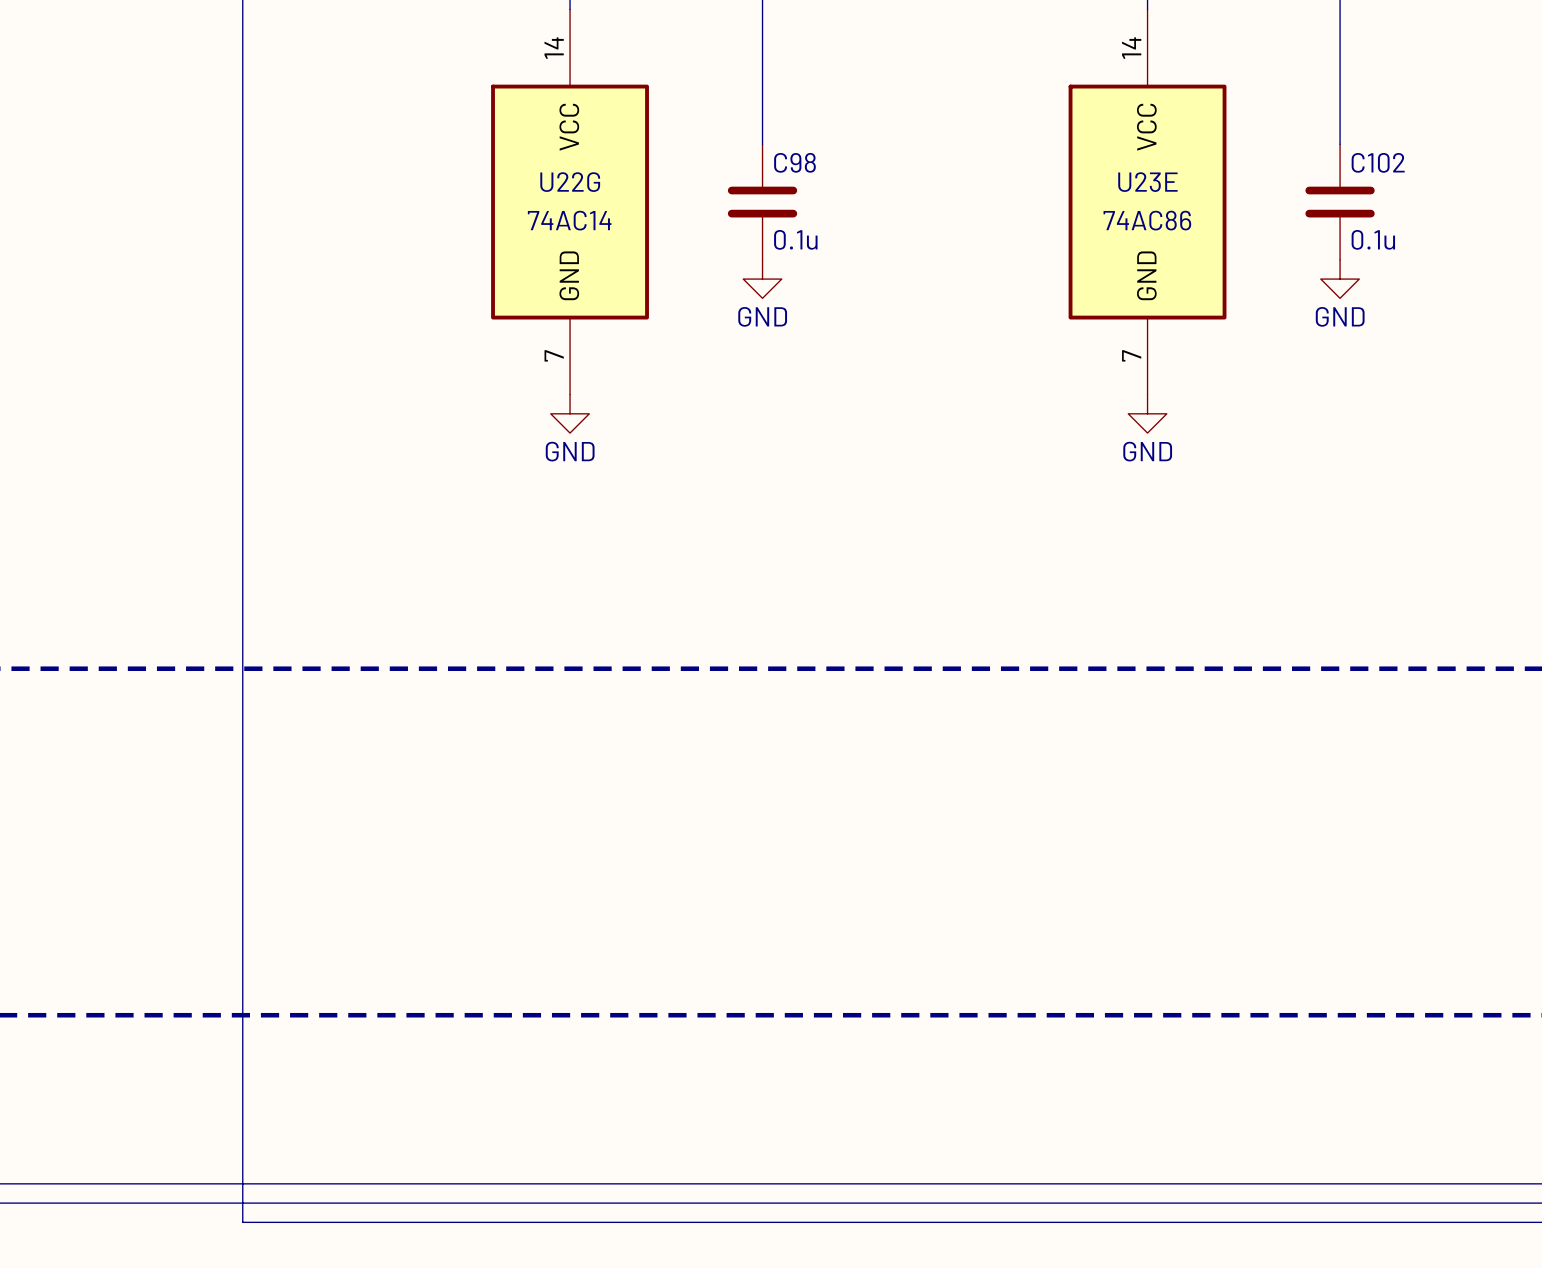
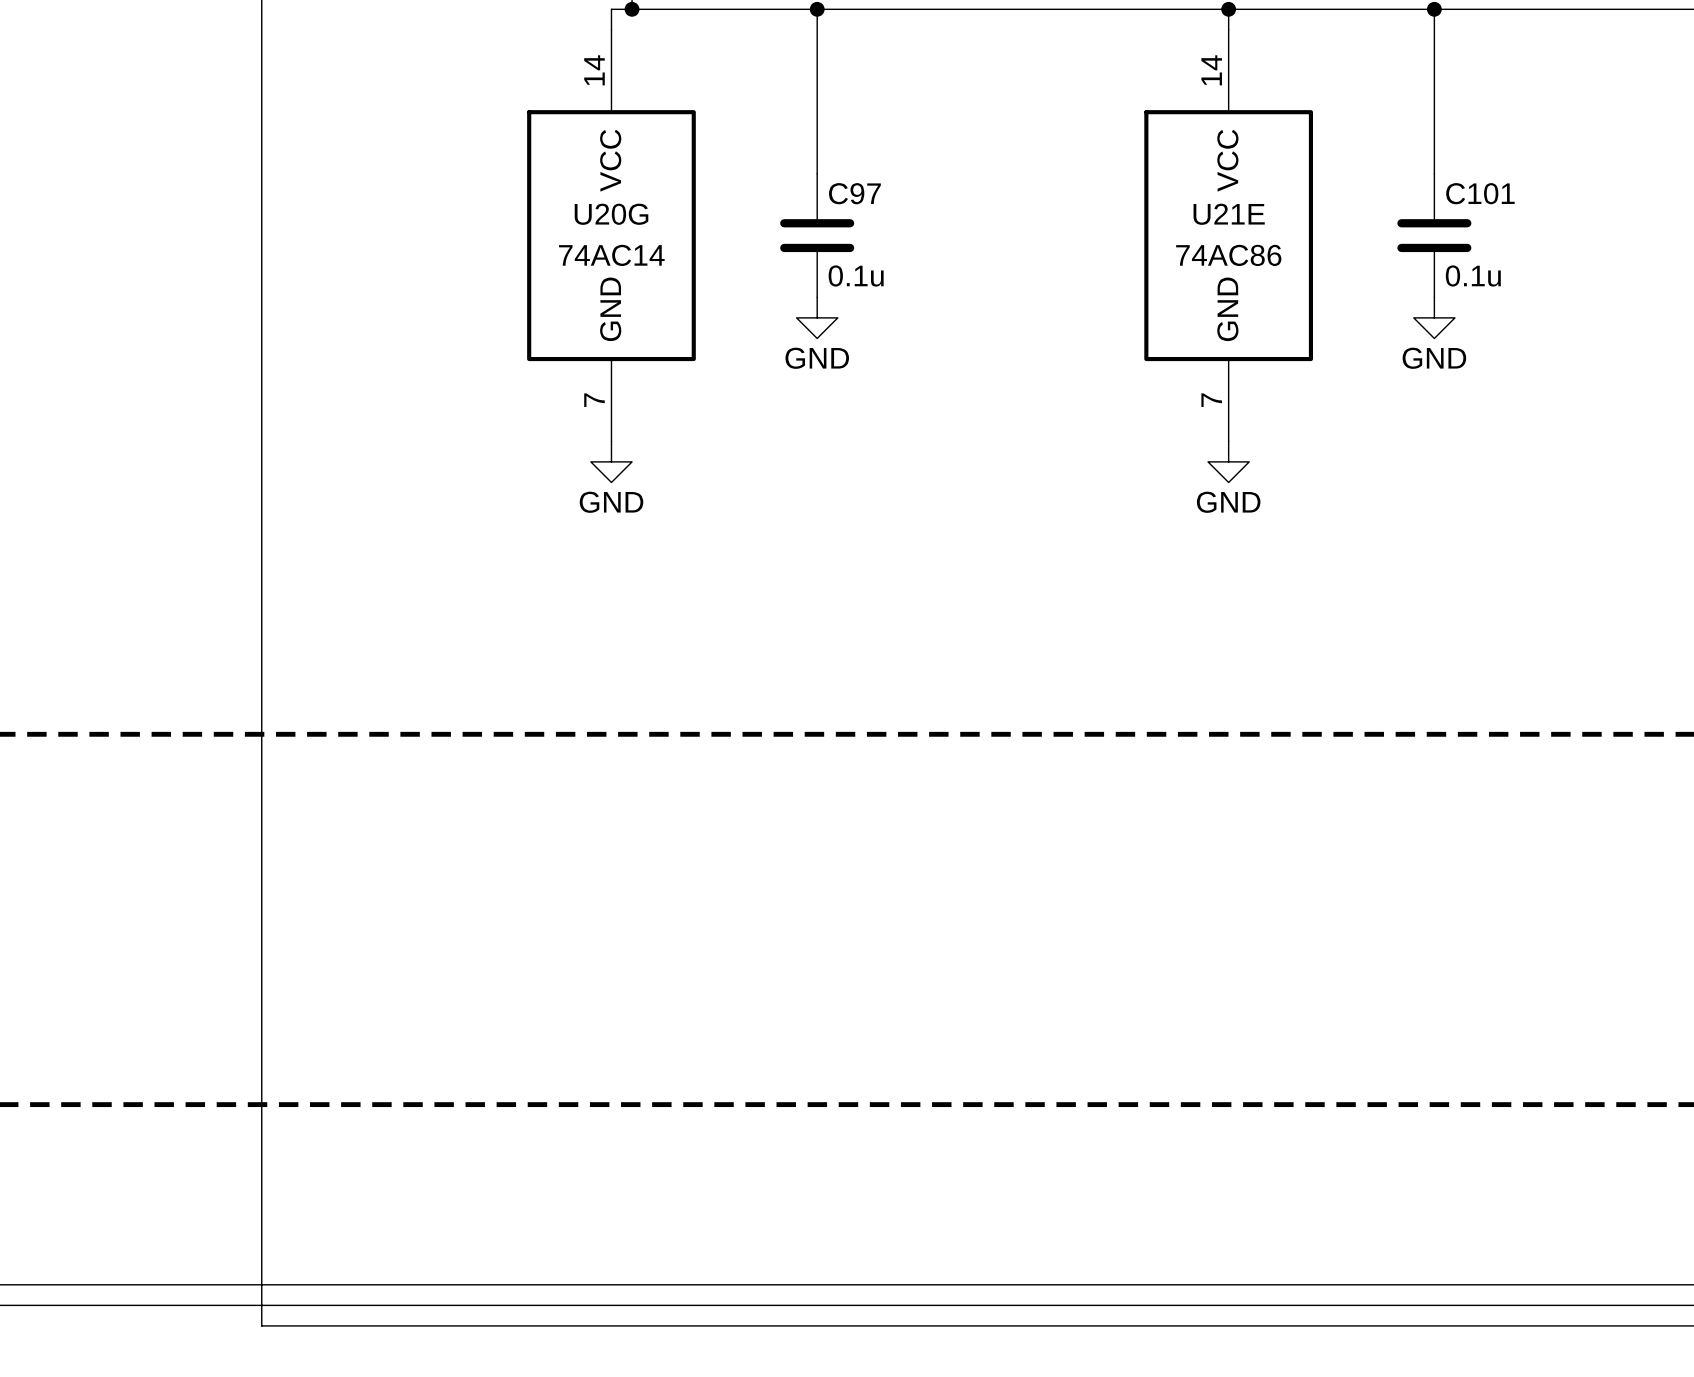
C98 name: C98 (794, 162) -> C97 (854, 193)
C102 name: C102 (1378, 162) -> C101 (1480, 193)
U22G name: U22G (570, 182) -> U20G (611, 214)
U23E name: U23E (1147, 182) -> U21E (1229, 214)

